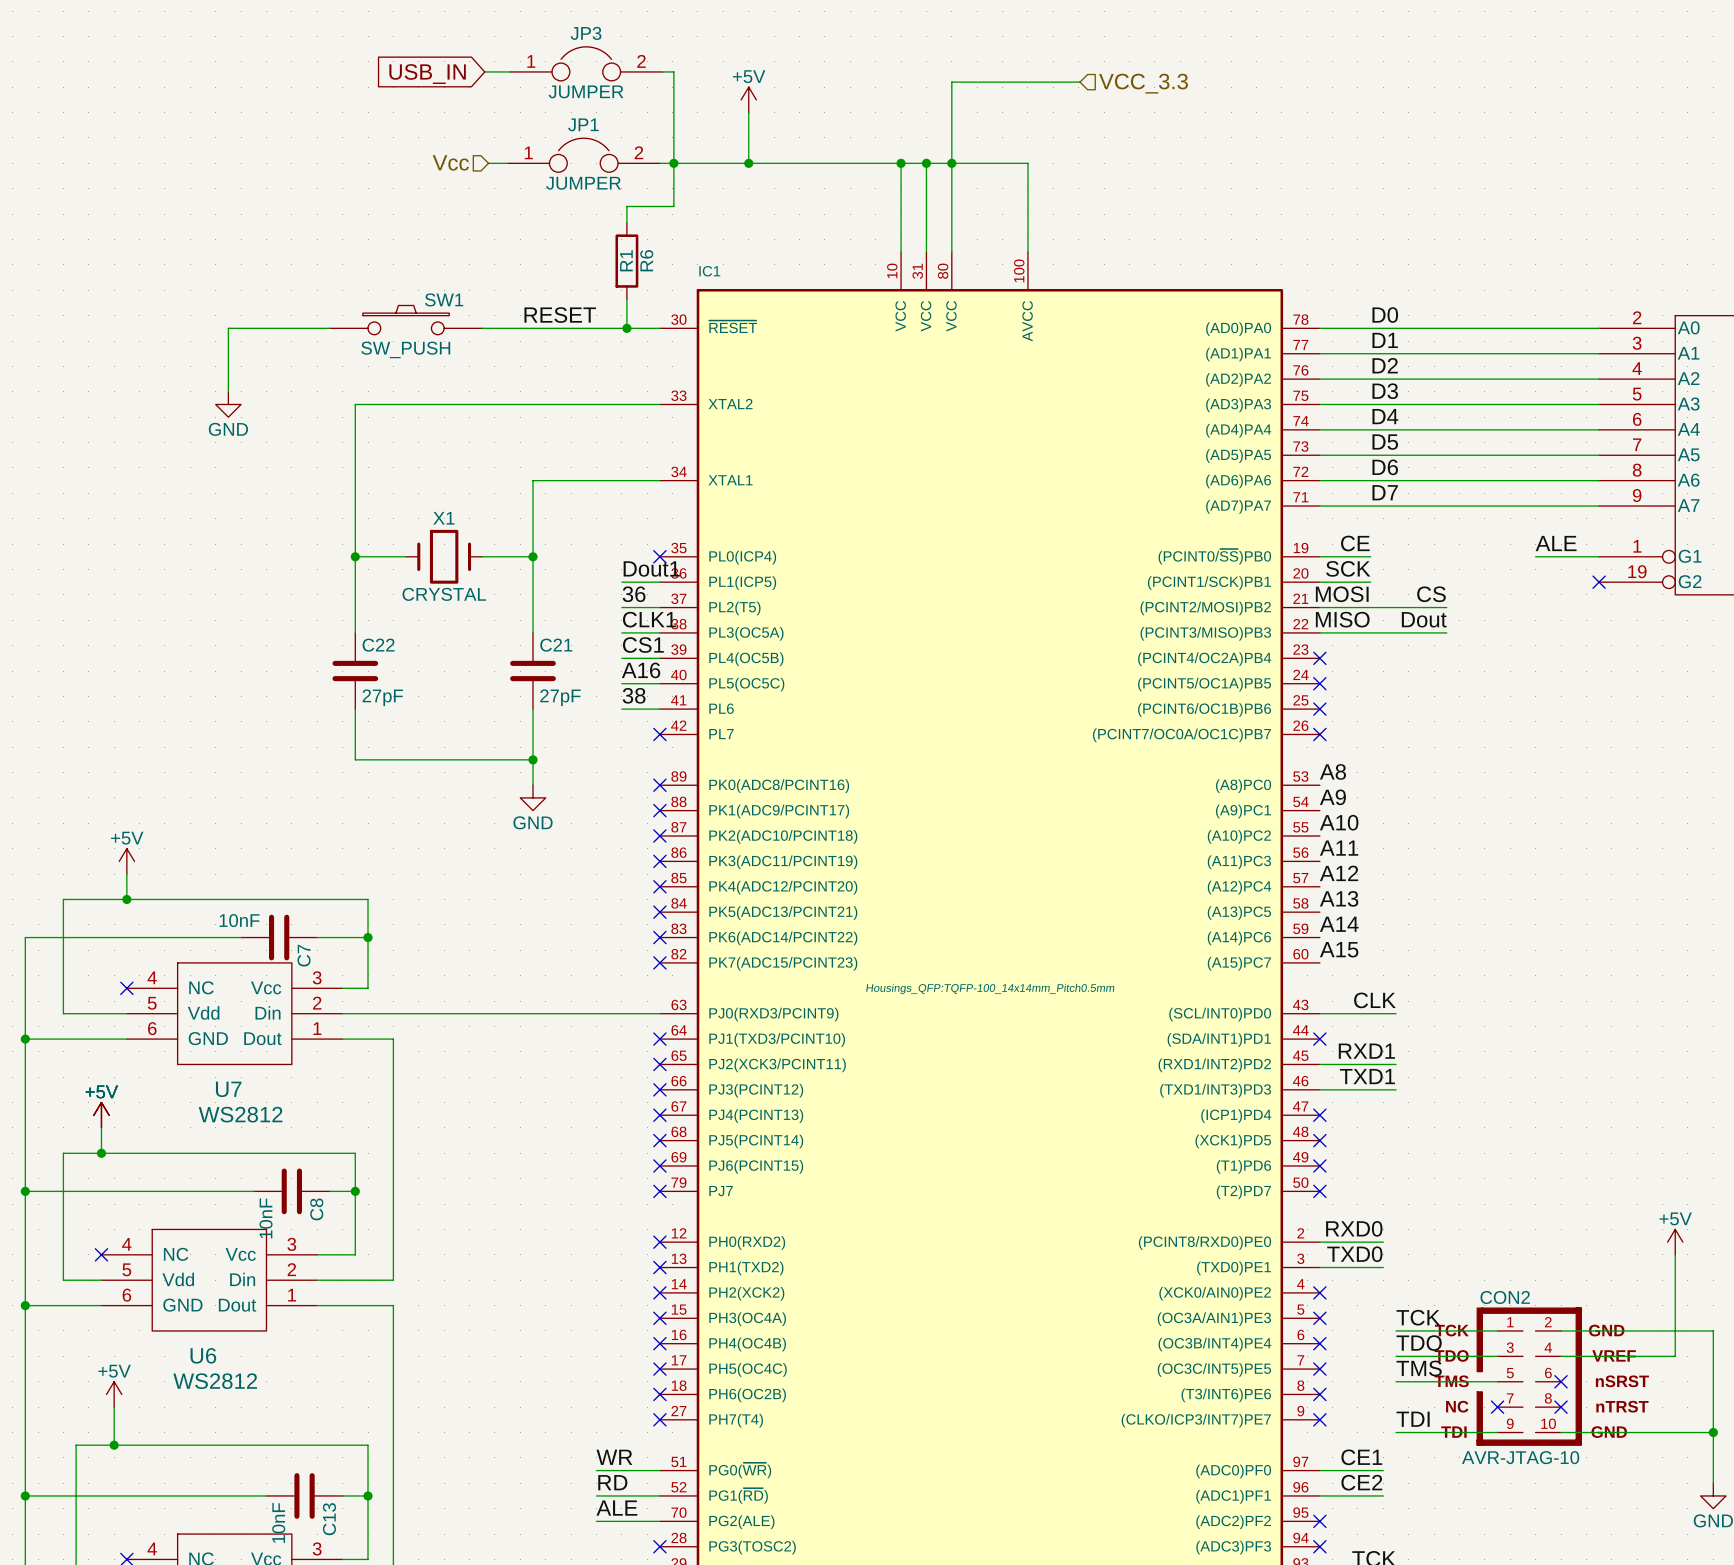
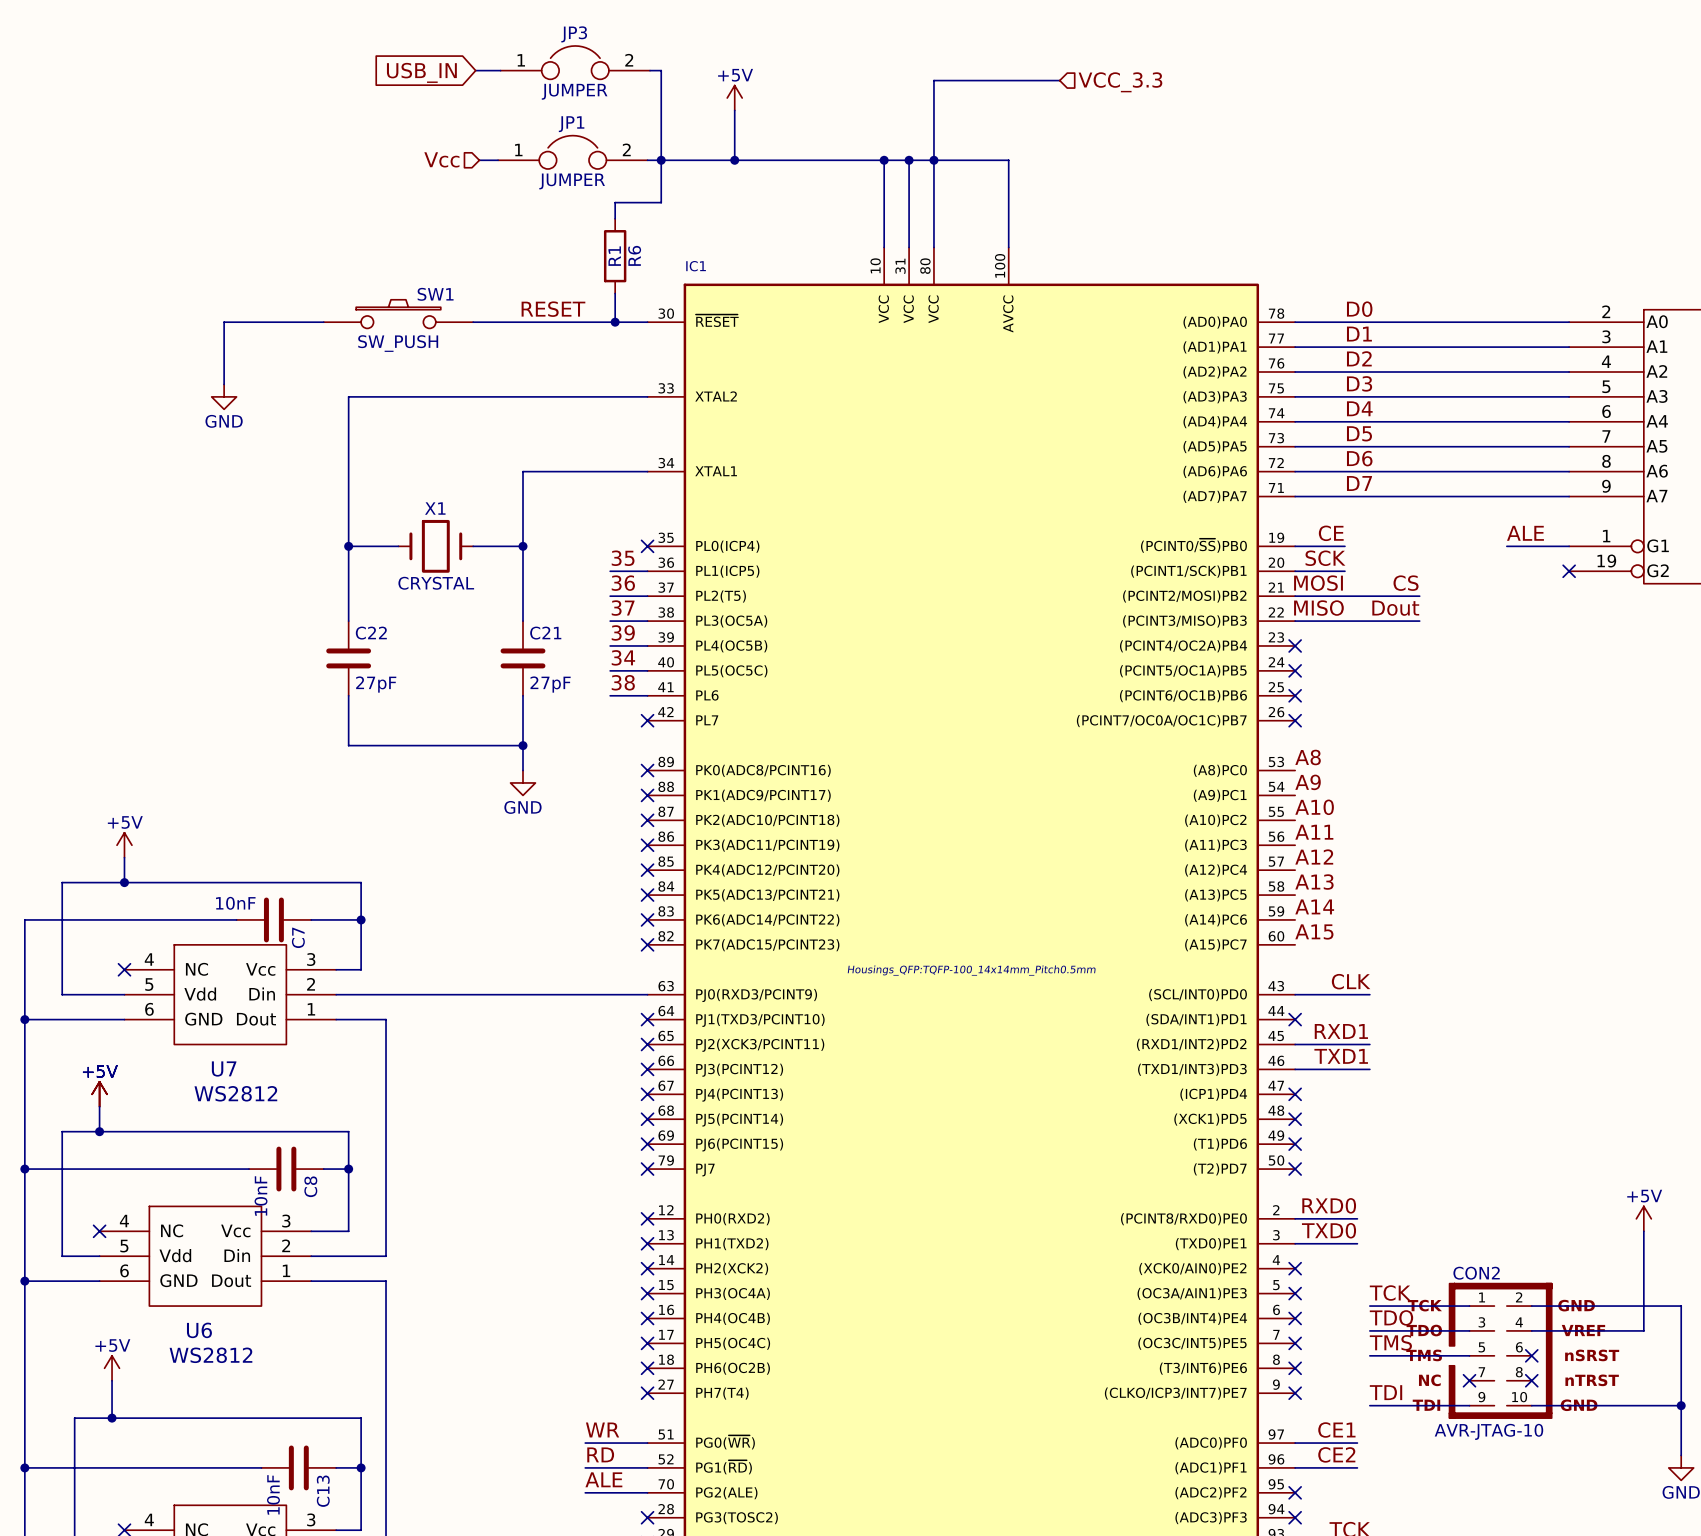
label: Dout1 (651, 568) -> 35 (623, 558)
label: CLK1 (649, 619) -> 37 (623, 608)
label: CS1 (643, 645) -> 39 (623, 632)
label: А16 (641, 670) -> 34 (623, 657)

